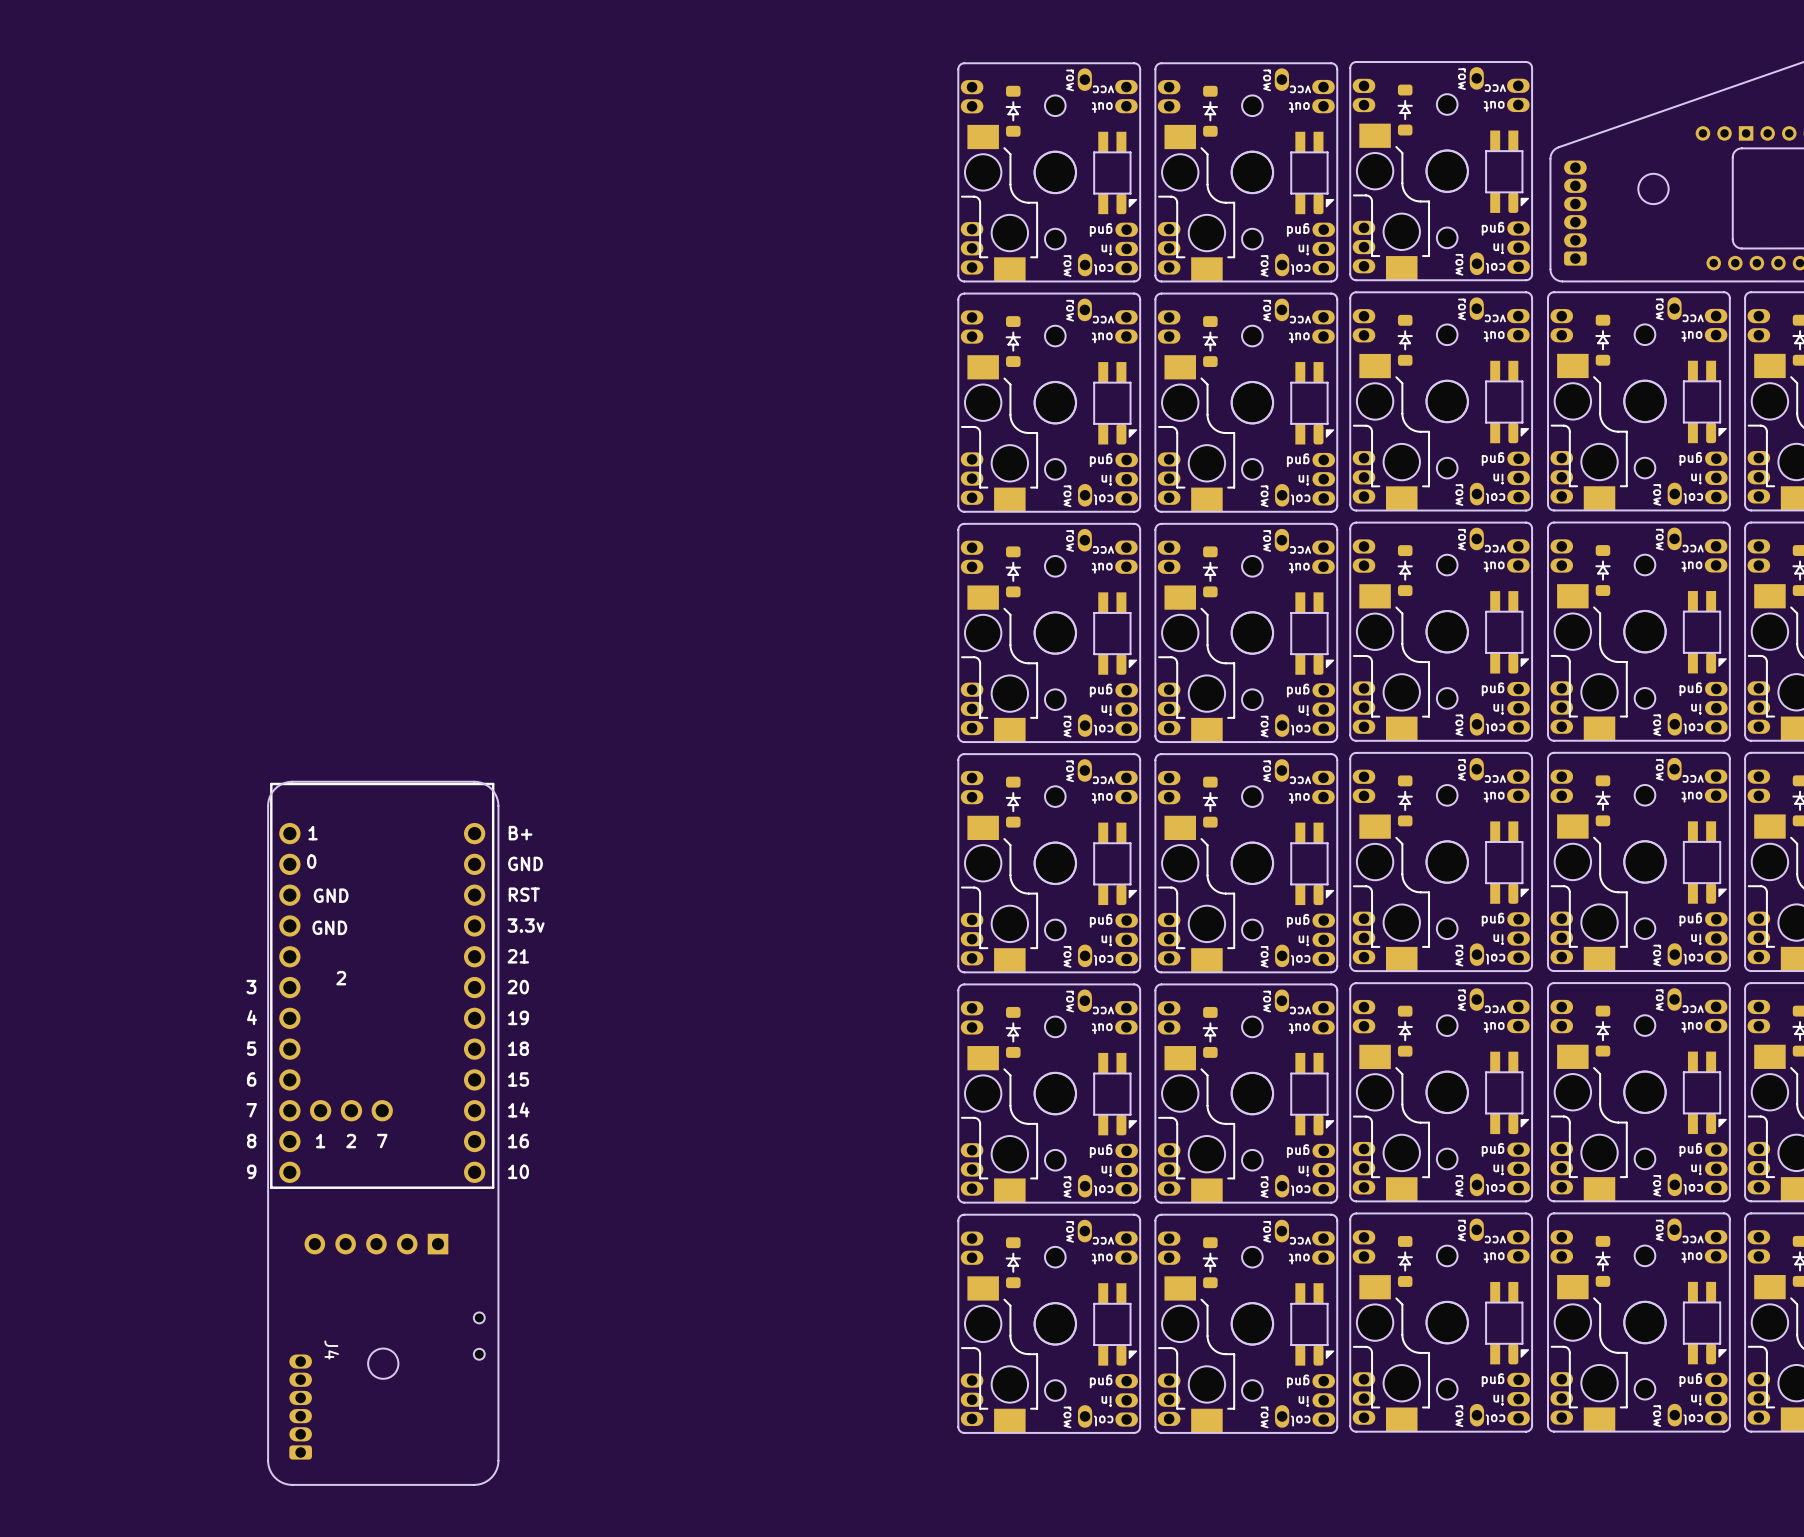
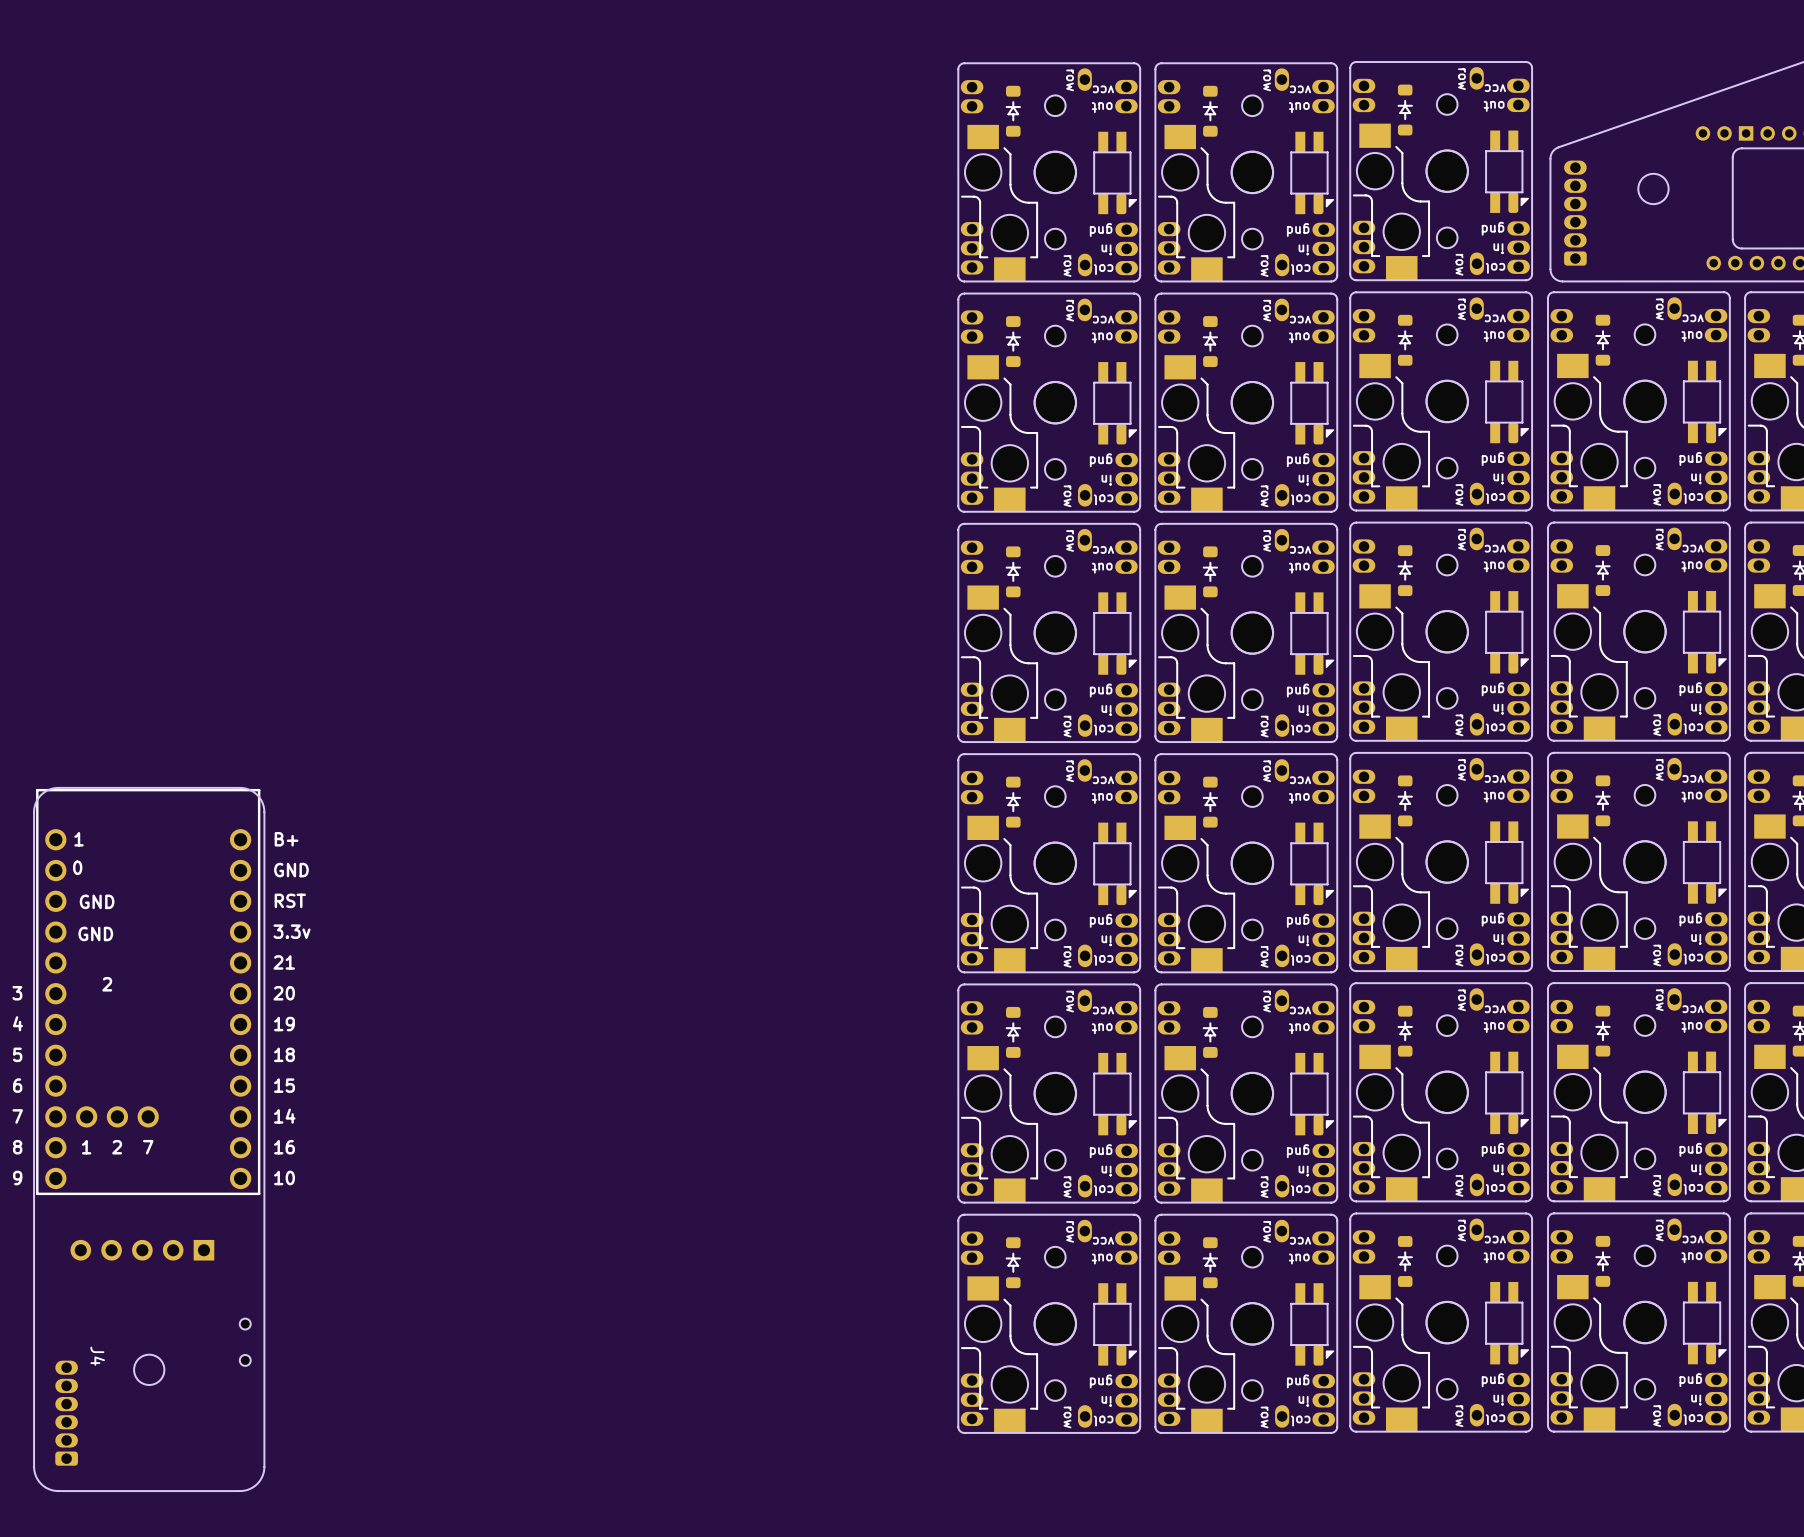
board edge: (474, 781) (289, 781) (275, 788) (268, 800) (268, 1460) (273, 1475) (286, 1484) (476, 1484) (491, 1477) (497, 1466) (498, 806) (496, 796) (491, 788) (483, 783) (474, 781) -> (240, 787) (55, 788) (43, 793) (34, 806) (34, 1467) (39, 1481) (52, 1490) (242, 1490) (257, 1484) (263, 1472) (264, 812) (262, 802) (257, 795) (249, 789) (240, 787)
part position: (382, 985) -> (148, 992)
part position: (376, 1244) -> (142, 1250)
part position: (479, 1336) -> (245, 1342)
round board edge position: (383, 1363) -> (149, 1369)
J4 position: (300, 1407) -> (66, 1413)

